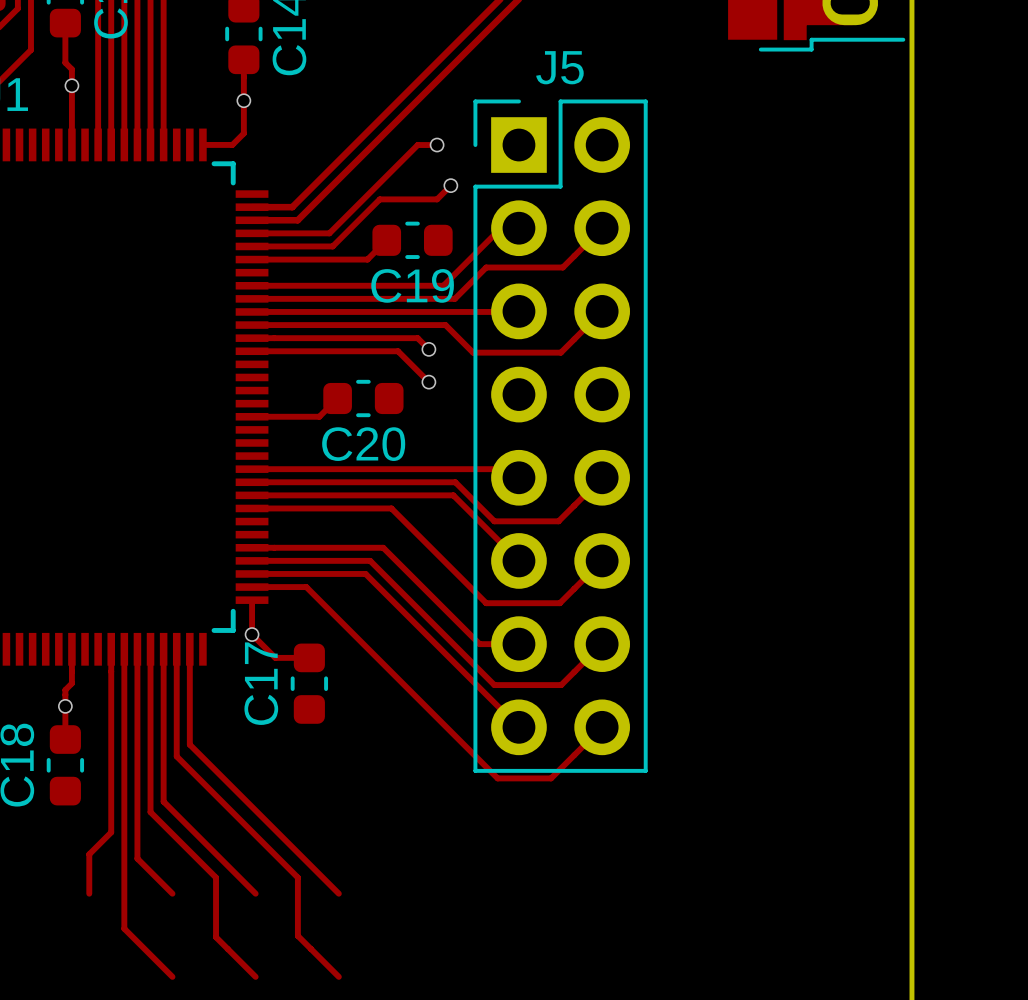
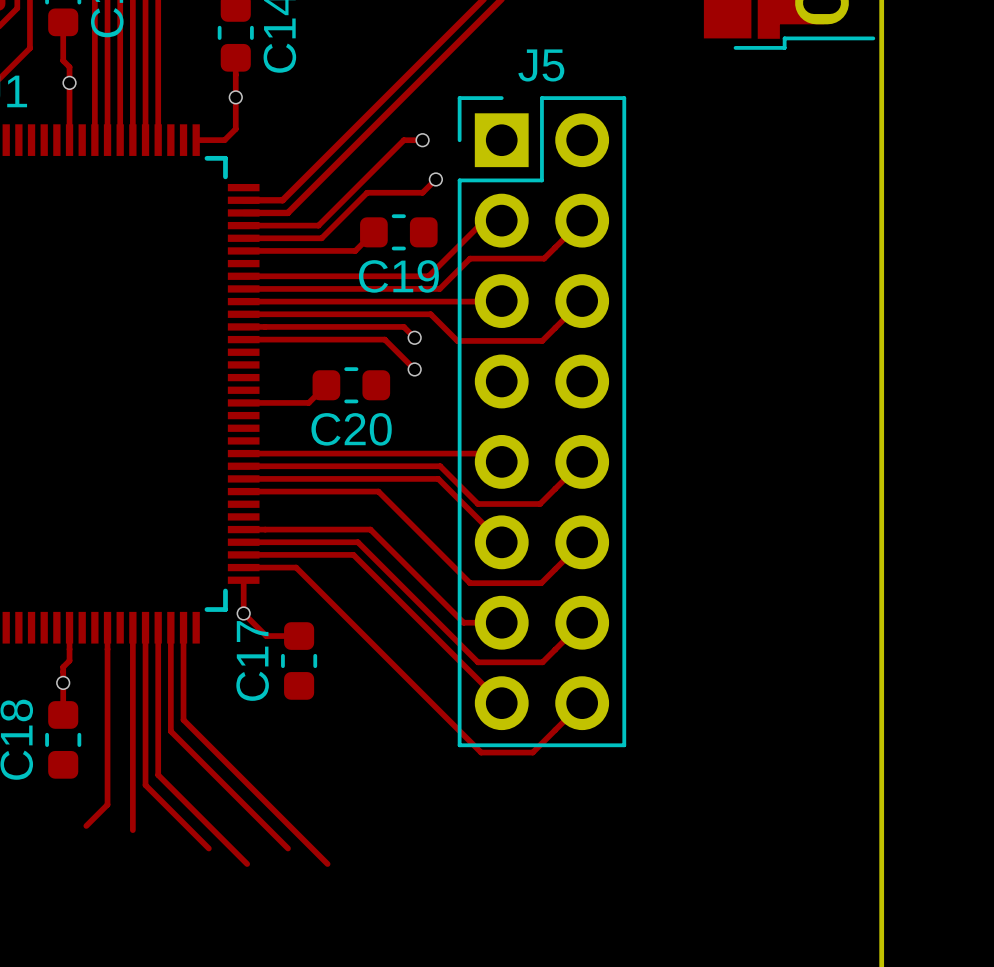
track: (124, 649) (124, 928) (172, 976) -> none
track: (89, 854) (89, 893) -> none
track: (137, 858) (172, 893) -> none
track: (216, 877) (216, 937) (255, 976) -> none
track: (297, 877) (297, 935) (338, 976) -> none

